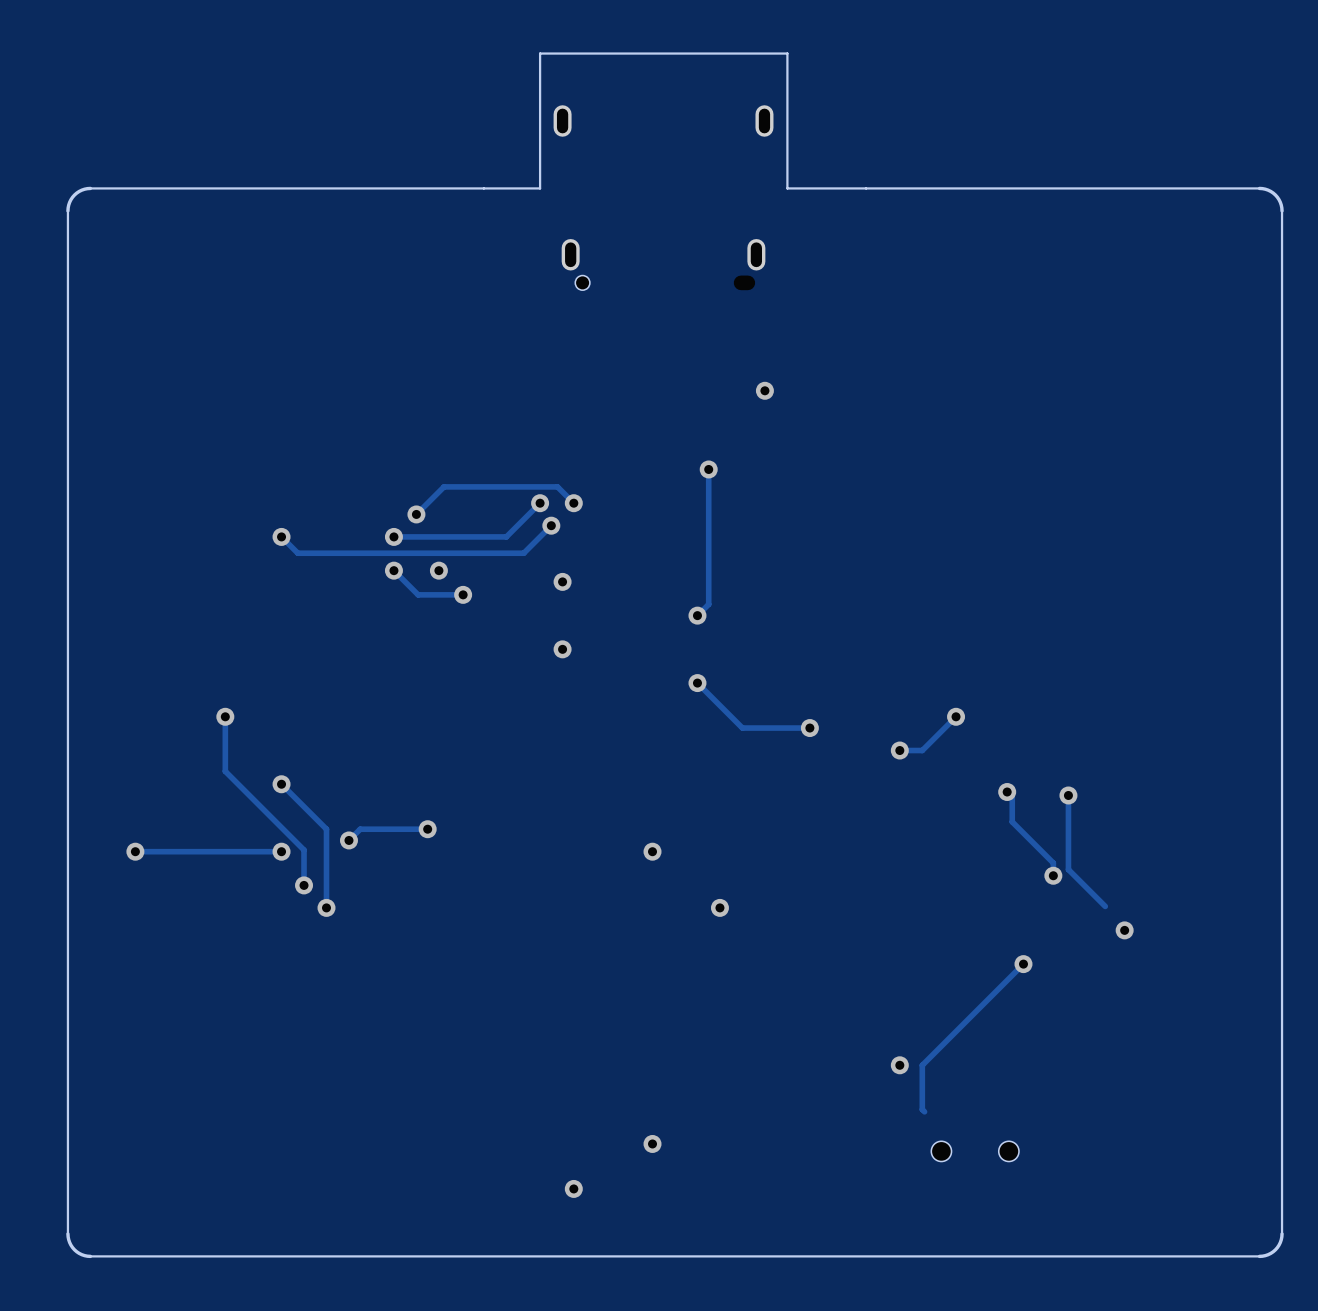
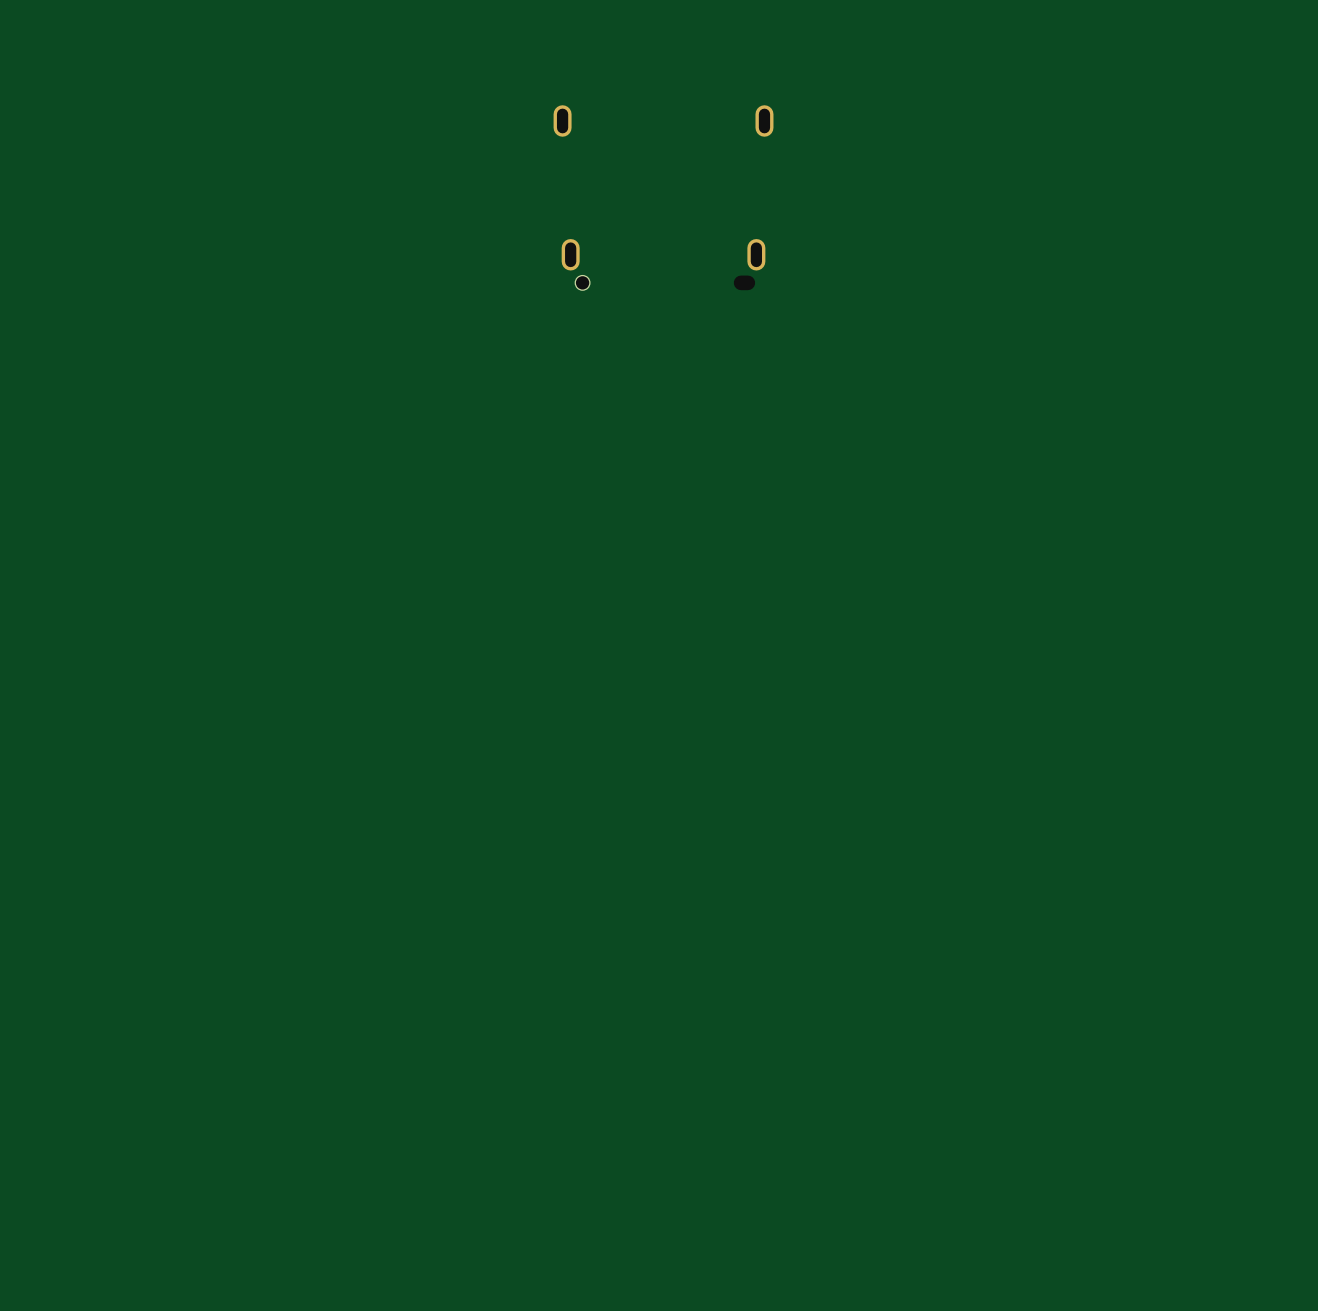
board edge: (787, 53) (787, 188) (1259, 188) (1273, 193) (1280, 202) (1282, 210) (1282, 1233) (1279, 1245) (1270, 1253) (1259, 1256) (90, 1256) (79, 1253) (70, 1245) (67, 1233) (67, 210) (70, 199) (79, 191) (90, 188) (540, 188) (540, 53) (787, 53) -> none
via: (764, 390) -> none
track: (708, 469) (708, 604) (697, 615) -> none
via: (708, 469) -> none
track: (540, 503) (506, 536) (393, 536) -> none
via: (540, 503) -> none
track: (573, 503) (557, 486) (443, 486) (416, 514) -> none
via: (573, 503) -> none
via: (416, 514) -> none
track: (551, 525) (523, 553) (297, 553) (281, 536) -> none
via: (551, 525) -> none
via: (281, 536) -> none
via: (393, 536) -> none
track: (393, 570) (418, 594) (463, 594) -> none
via: (393, 570) -> none
via: (438, 570) -> none
via: (562, 581) -> none
via: (463, 594) -> none
via: (697, 615) -> none
via: (562, 649) -> none
track: (697, 683) (742, 728) (809, 728) -> none
via: (697, 683) -> none
track: (225, 716) (225, 771) (304, 850) (304, 885) -> none
via: (225, 716) -> none
track: (956, 716) (922, 750) (899, 750) -> none
via: (956, 716) -> none
via: (809, 728) -> none
via: (899, 750) -> none
track: (281, 784) (326, 829) (326, 907) -> none
via: (281, 784) -> none
track: (1007, 792) (1012, 797) (1012, 821) (1053, 863) (1053, 875) -> none
via: (1007, 792) -> none
track: (1068, 795) (1068, 869) (1105, 906) -> none
via: (1068, 795) -> none
track: (427, 829) (360, 829) (348, 840) -> none
via: (427, 829) -> none
via: (348, 840) -> none
via: (135, 851) -> none
track: (281, 851) (135, 851) -> none
via: (281, 851) -> none
via: (652, 851) -> none
via: (1053, 875) -> none
via: (304, 885) -> none
via: (326, 907) -> none
via: (719, 907) -> none
via: (1124, 930) -> none
track: (1023, 964) (922, 1065) (922, 1109) (924, 1111) -> none
via: (1023, 964) -> none
via: (899, 1065) -> none
via: (652, 1143) -> none
part: (975, 1151) -> none
via: (573, 1188) -> none

